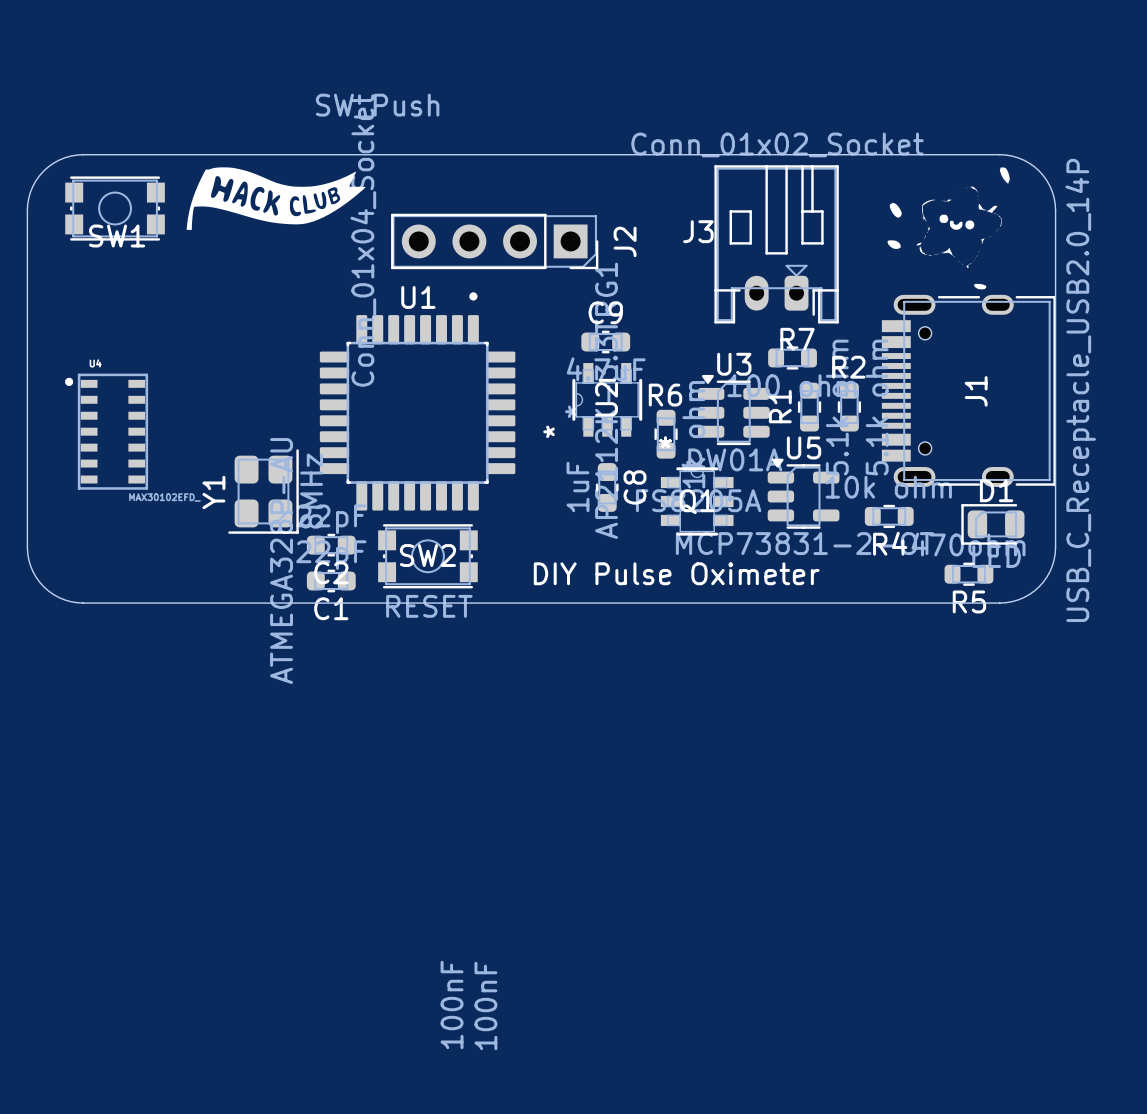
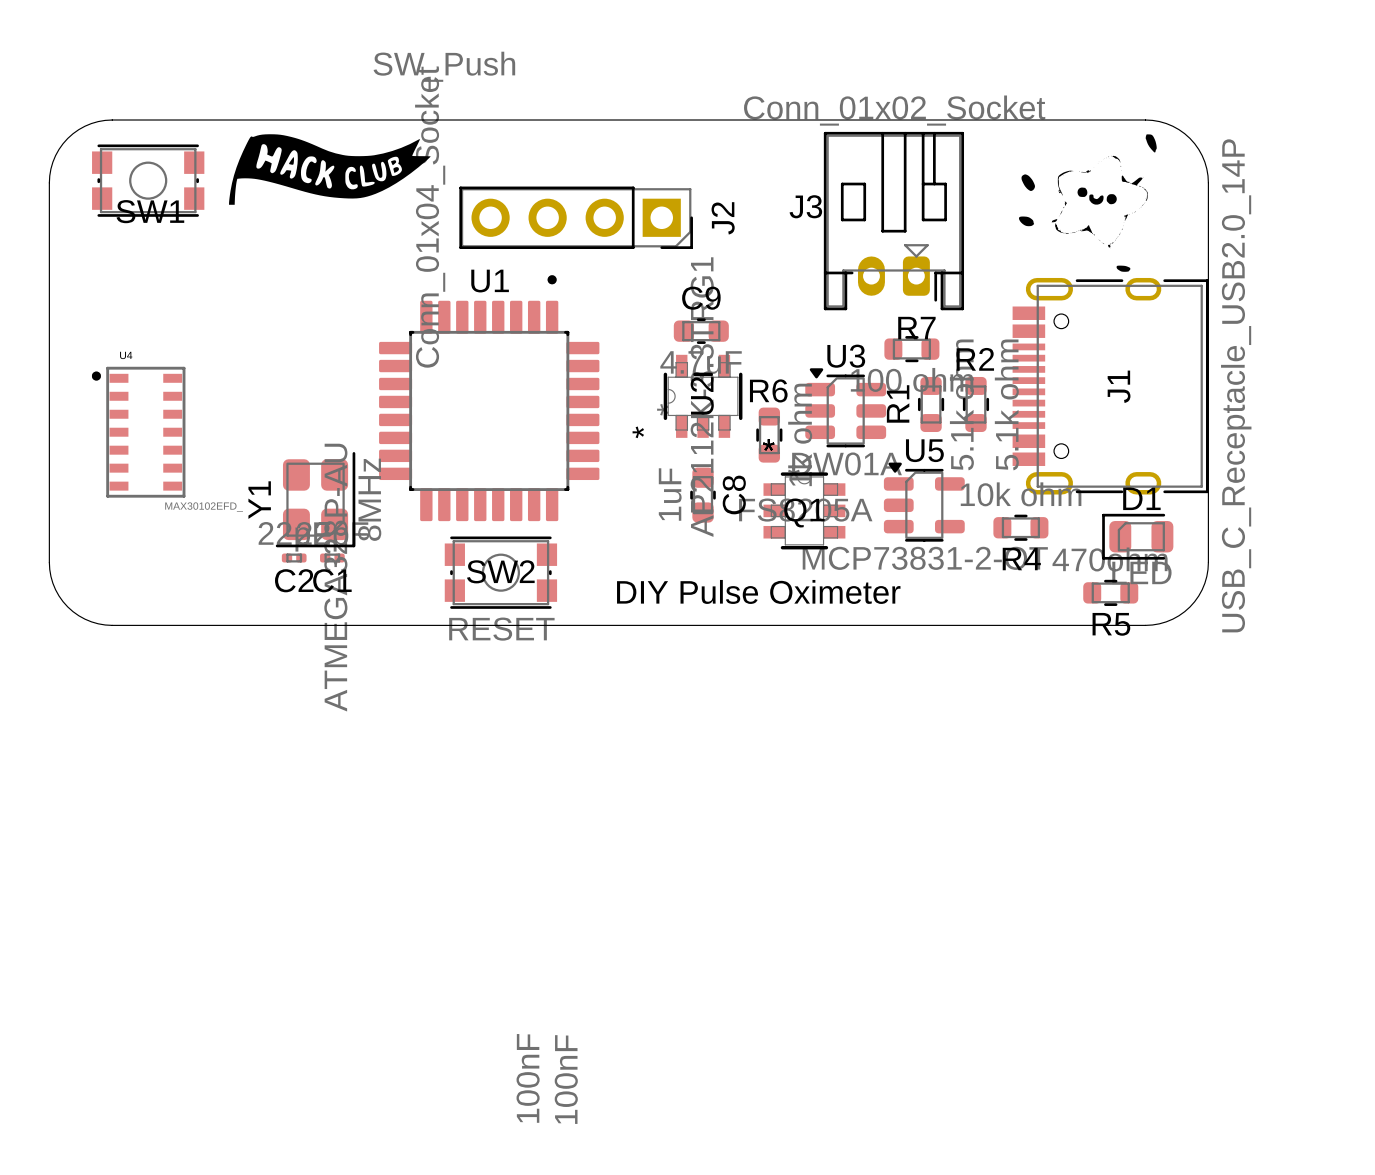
C2 footprint: [306, 533, 356, 557] -> [281, 553, 307, 563]
C1 footprint: [306, 569, 356, 593] -> [320, 553, 345, 563]

